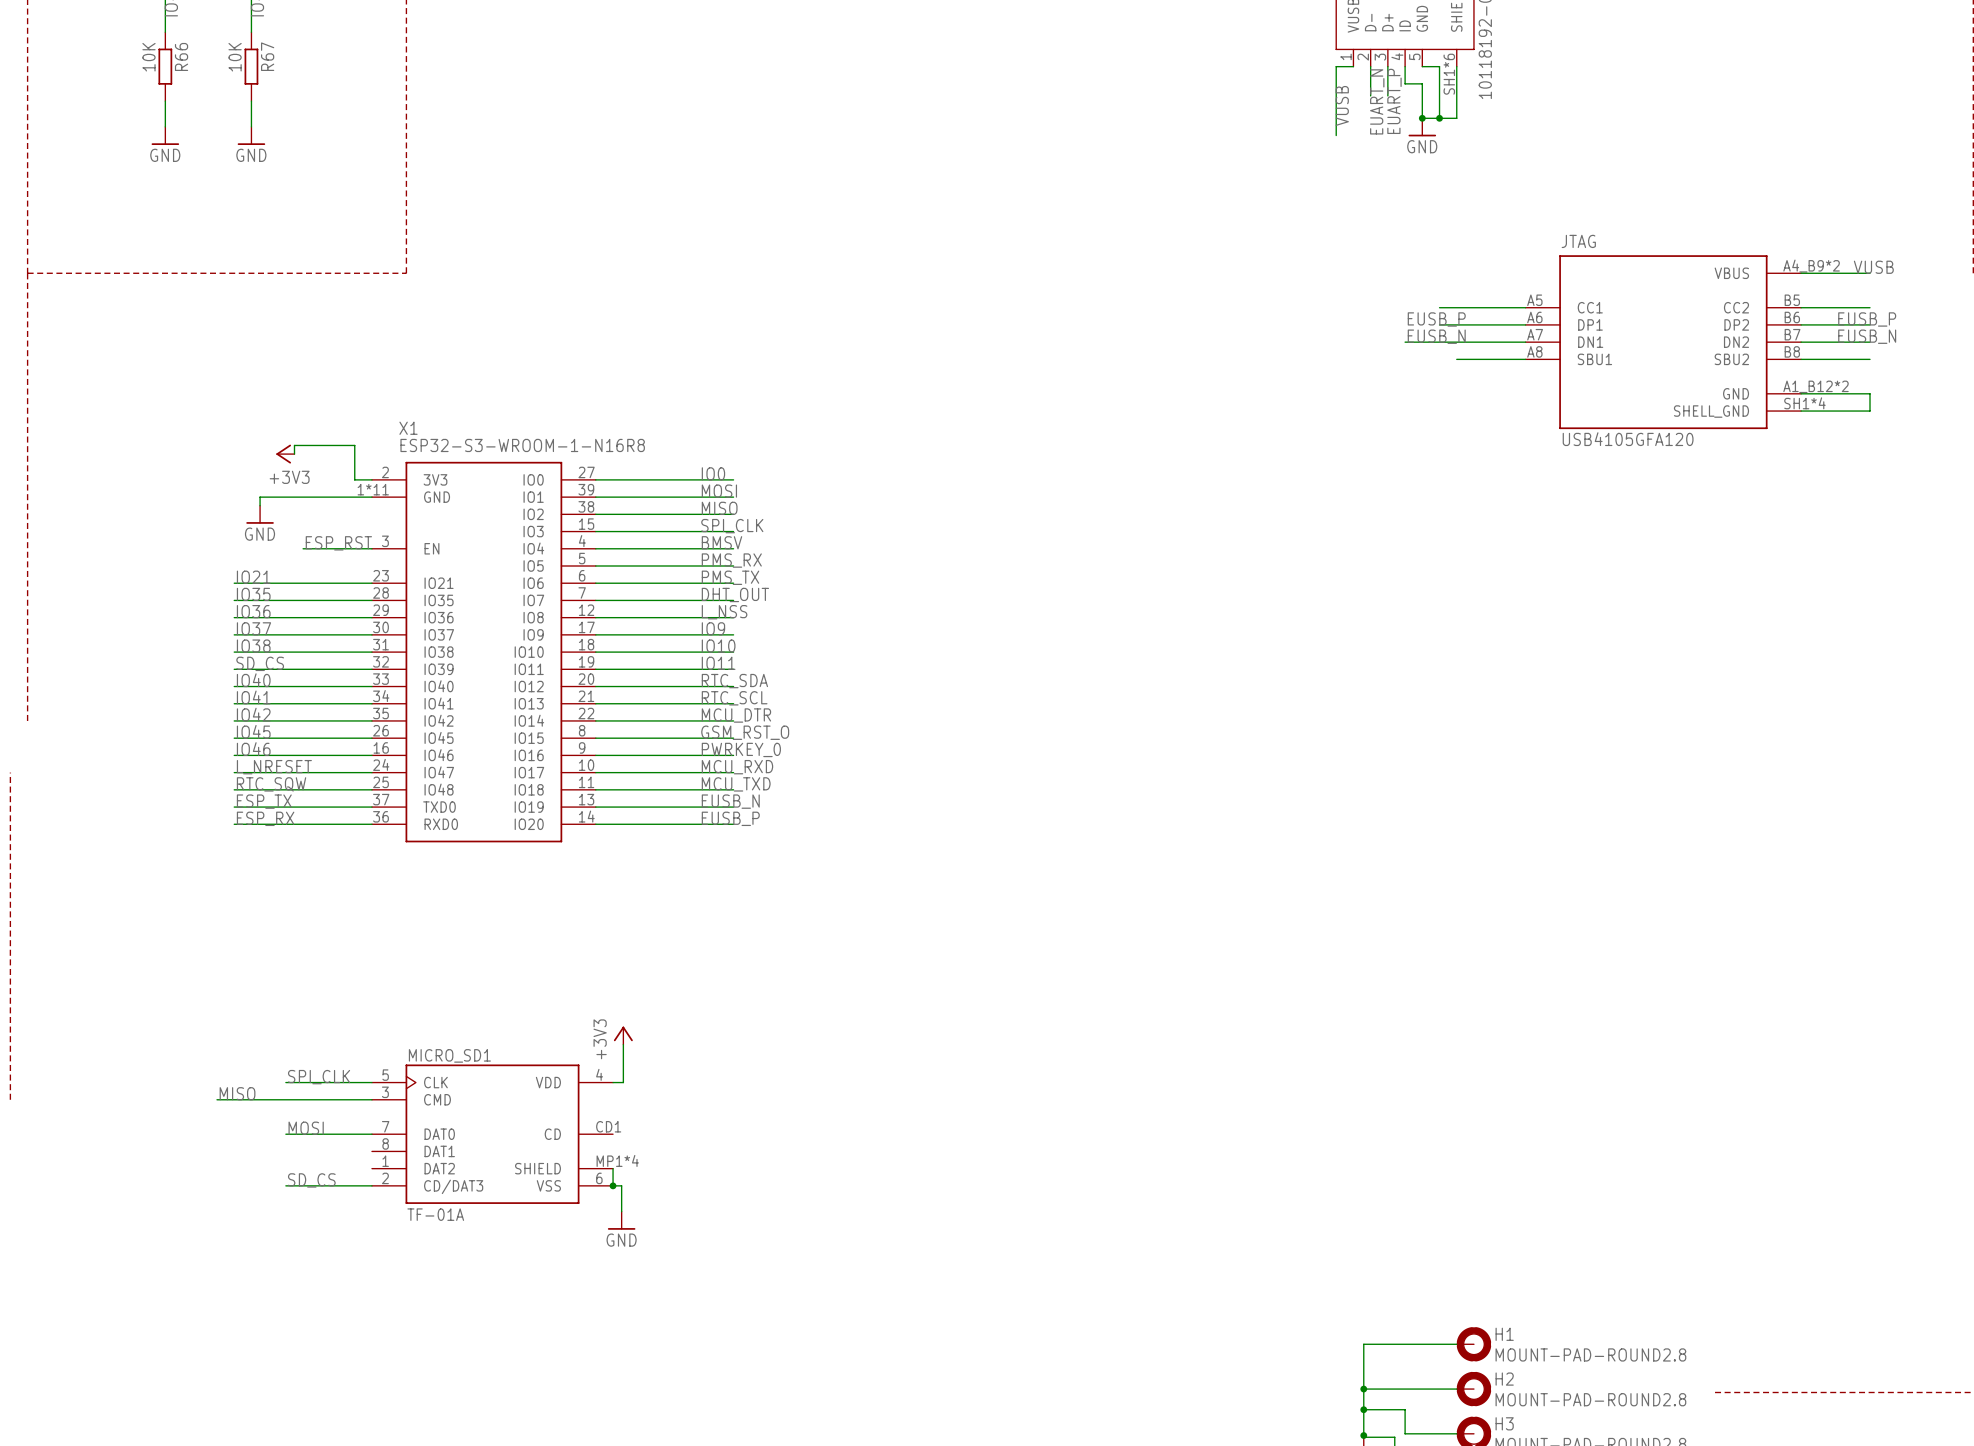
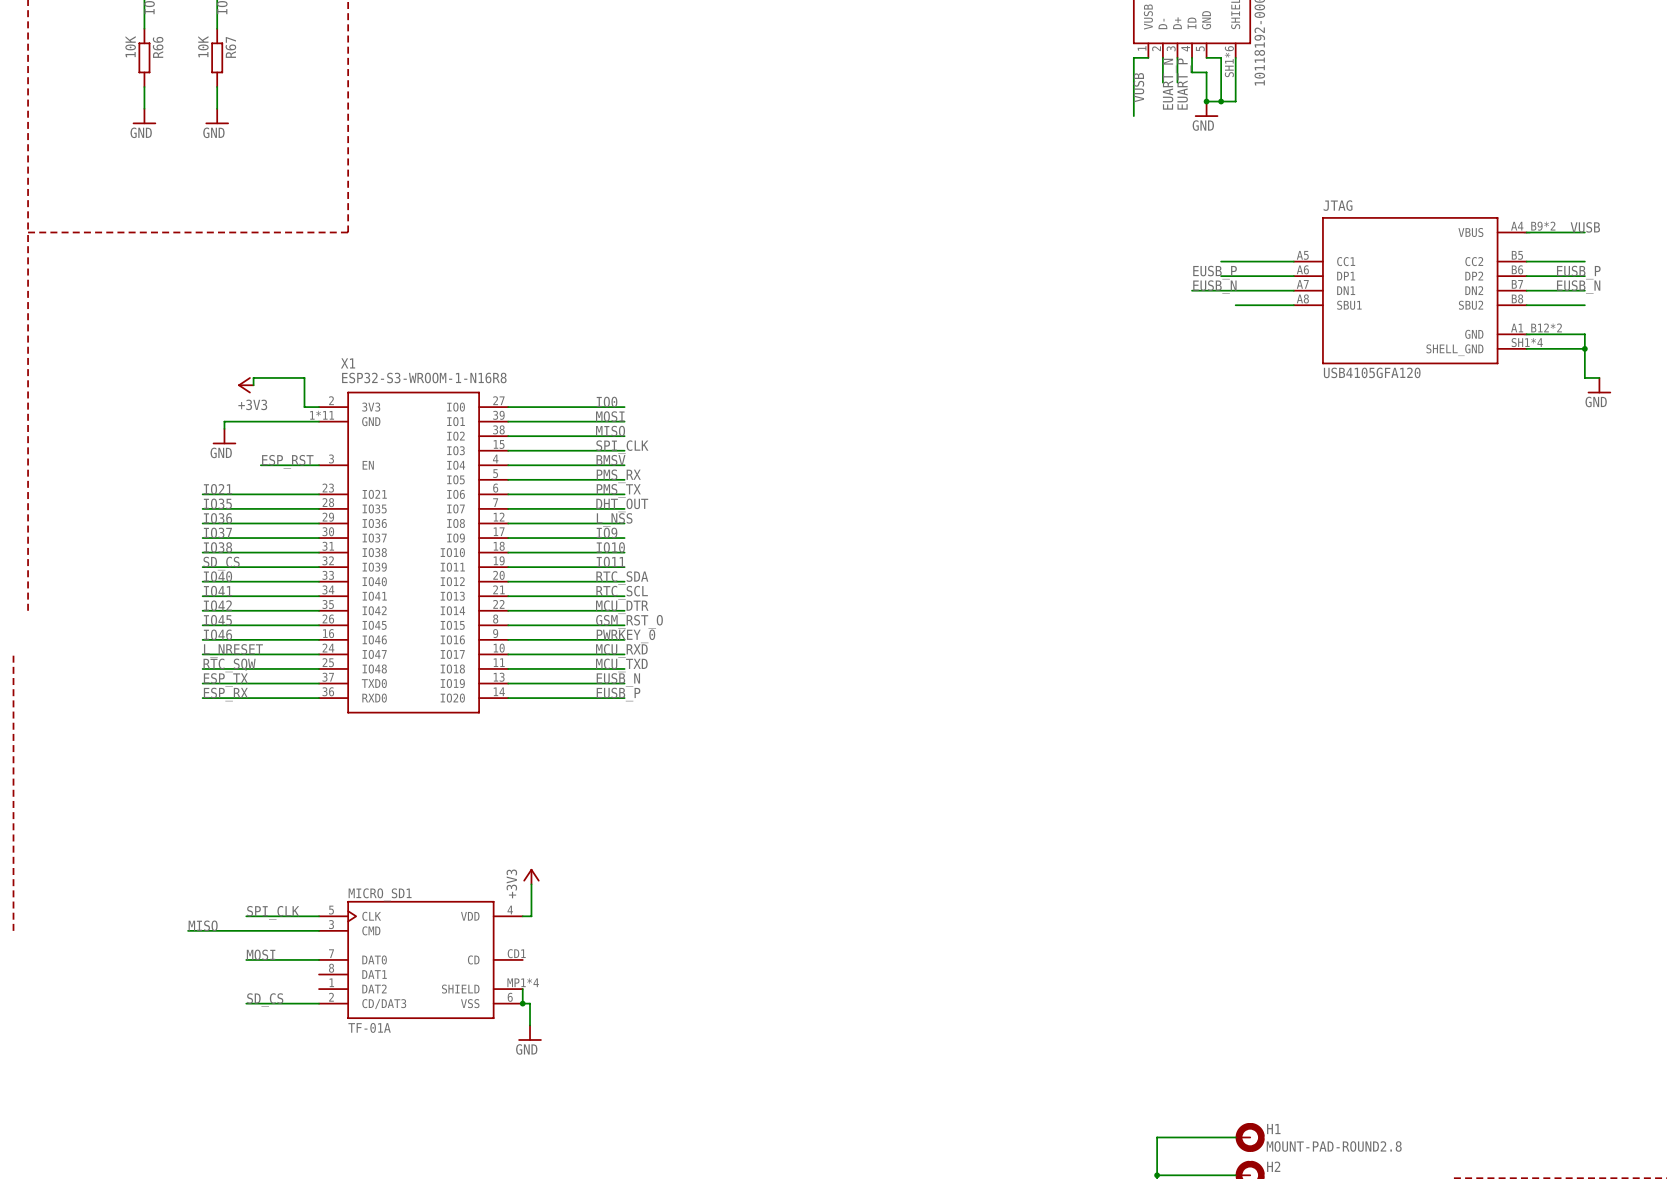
wire: none -> (1584, 348) (1584, 377) (1599, 377)
junction: none -> (1584, 348)
power symbol: none -> GND (1599, 385)

